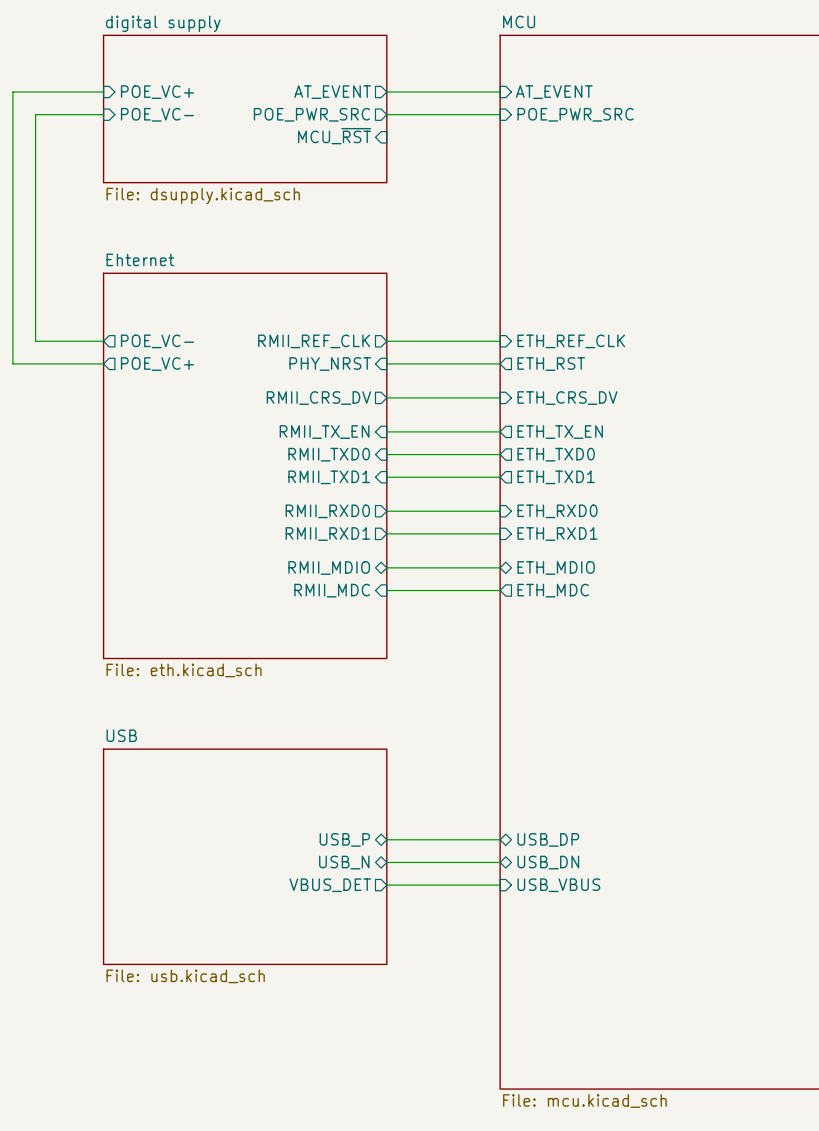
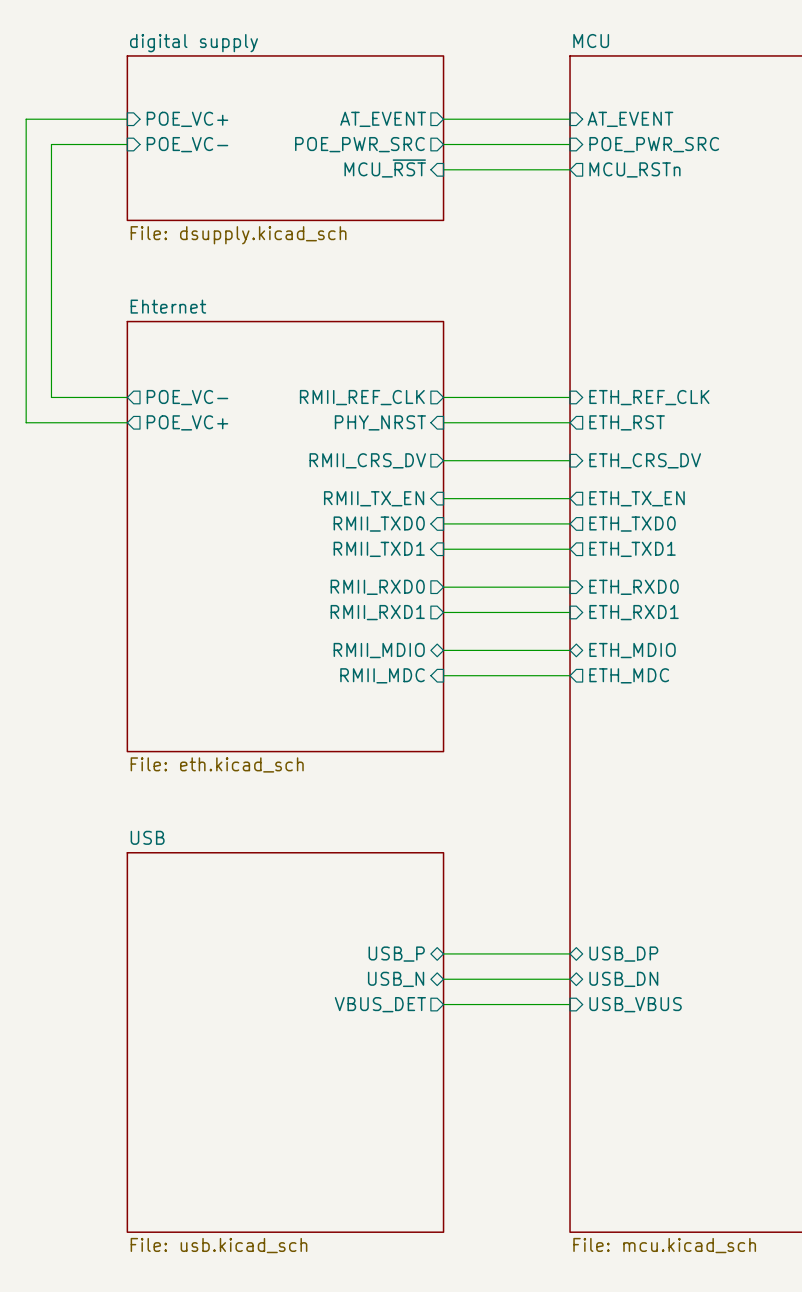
wire: none -> (443, 169) (570, 169)
sheet pin: none -> MCU_RSTn (634, 169)
sheet USB: File: usb.kicad_sch (245, 856) -> none
sheet USB: none -> File: usb.kicad_sch (285, 1042)

